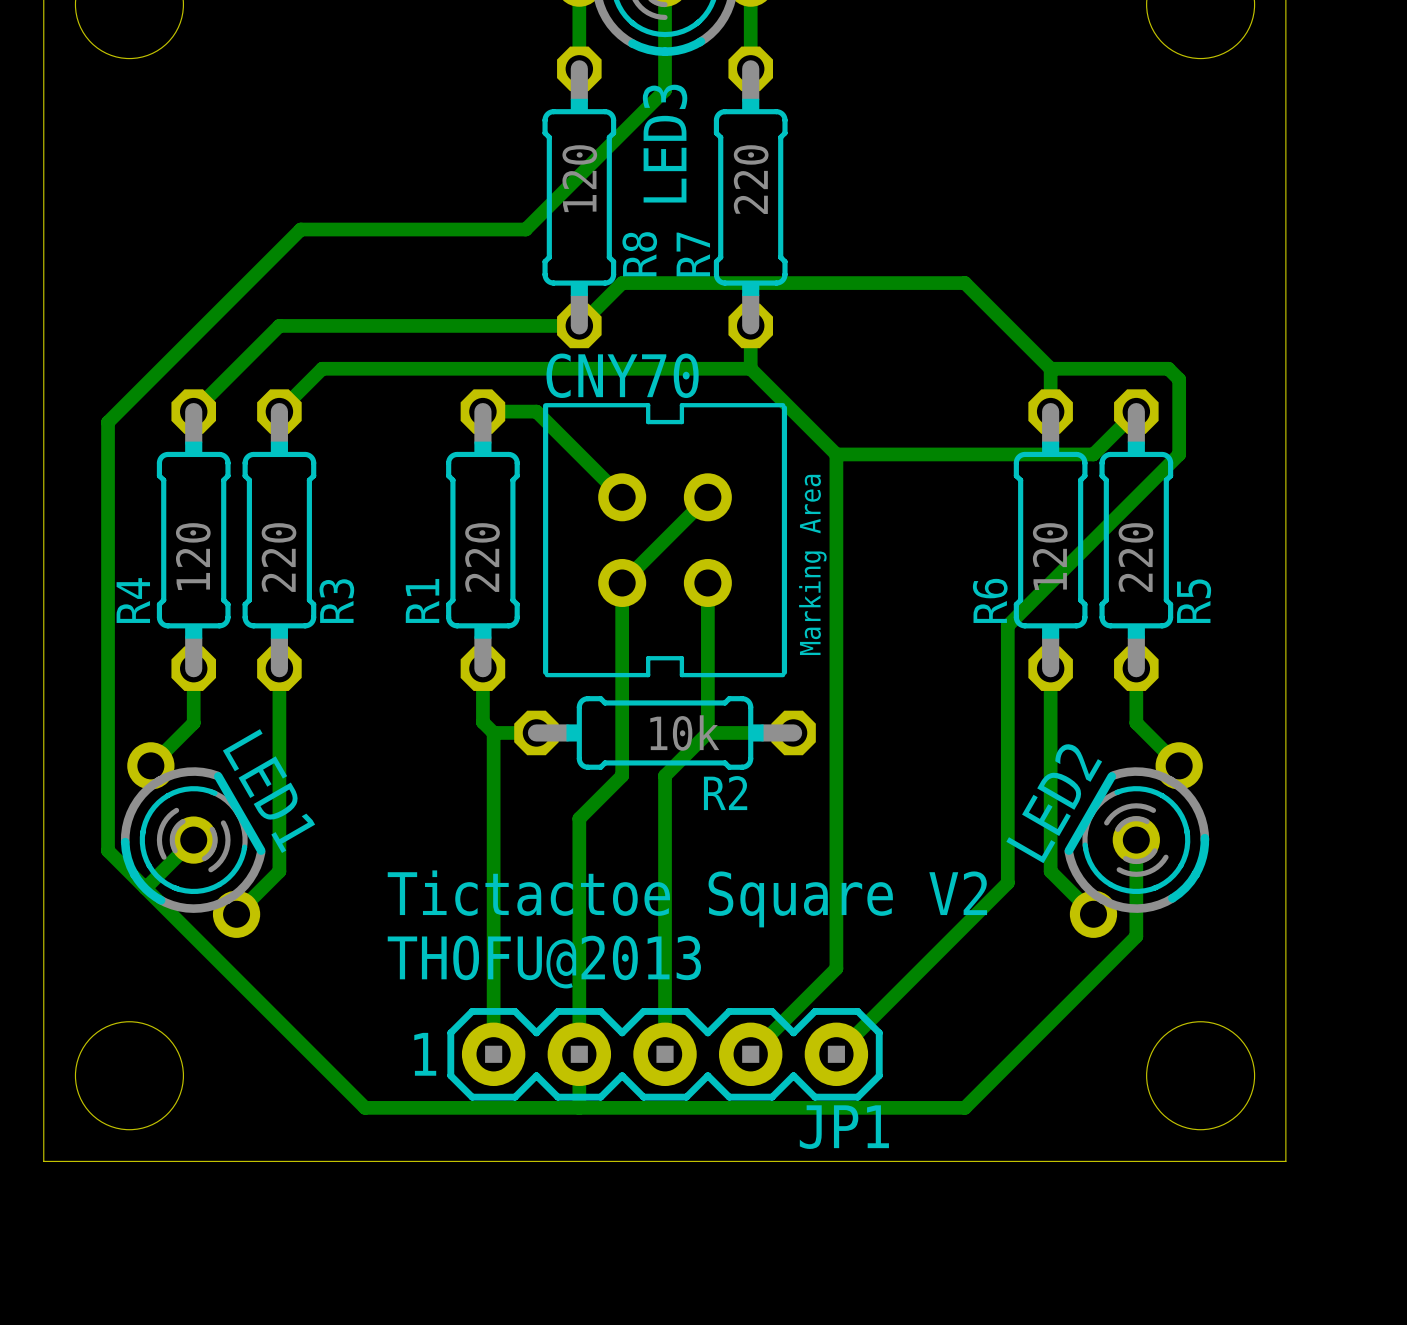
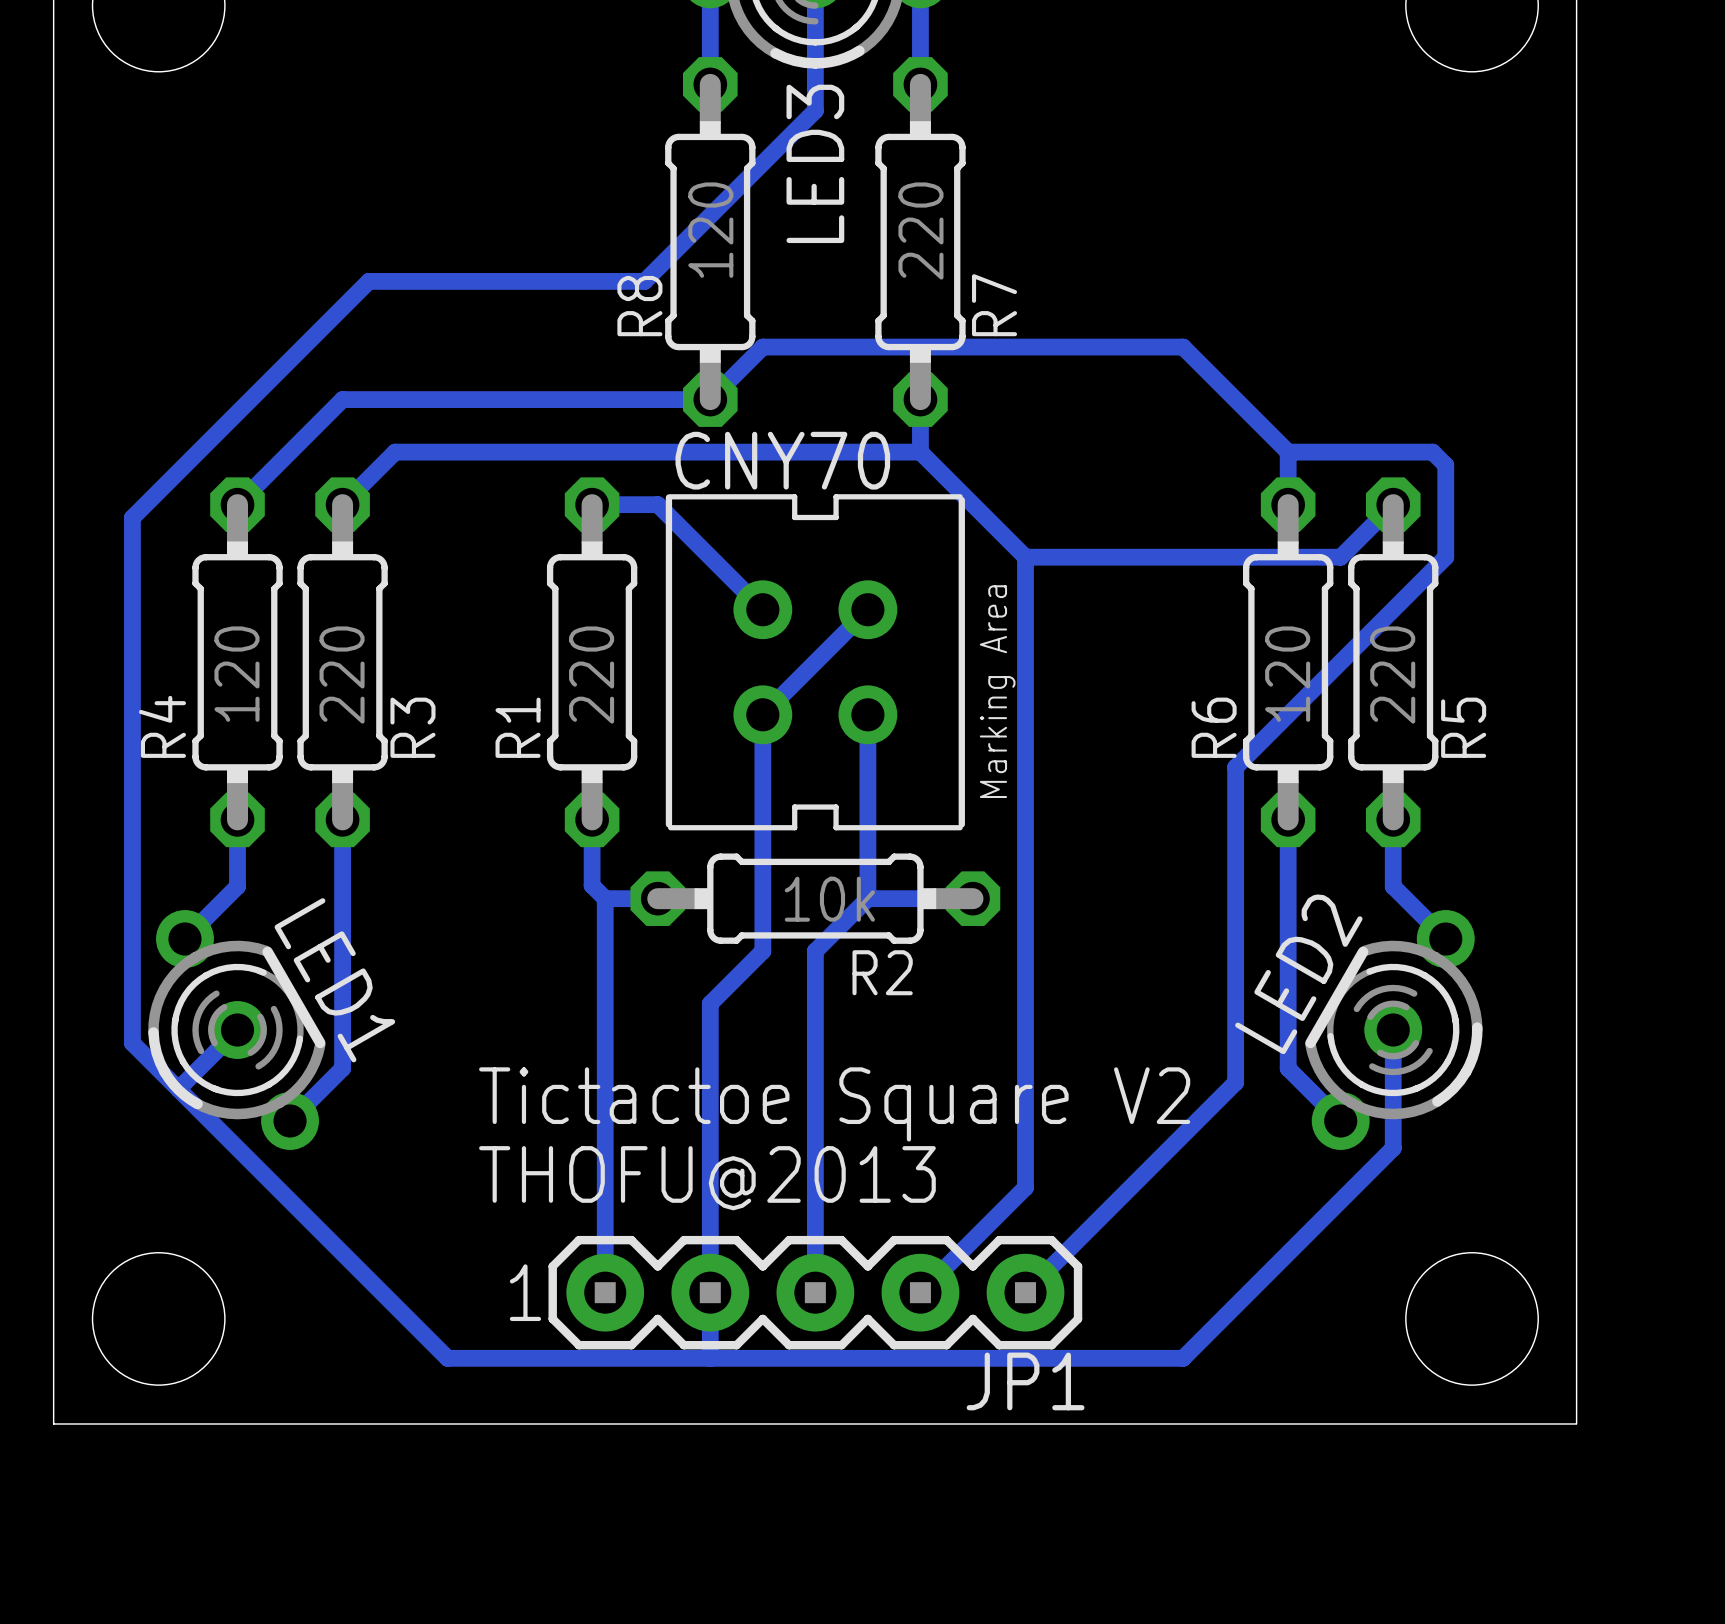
R8 name position: R8 (639, 254) -> R8 (639, 306)
R7 name position: R7 (693, 254) -> R7 (994, 305)

